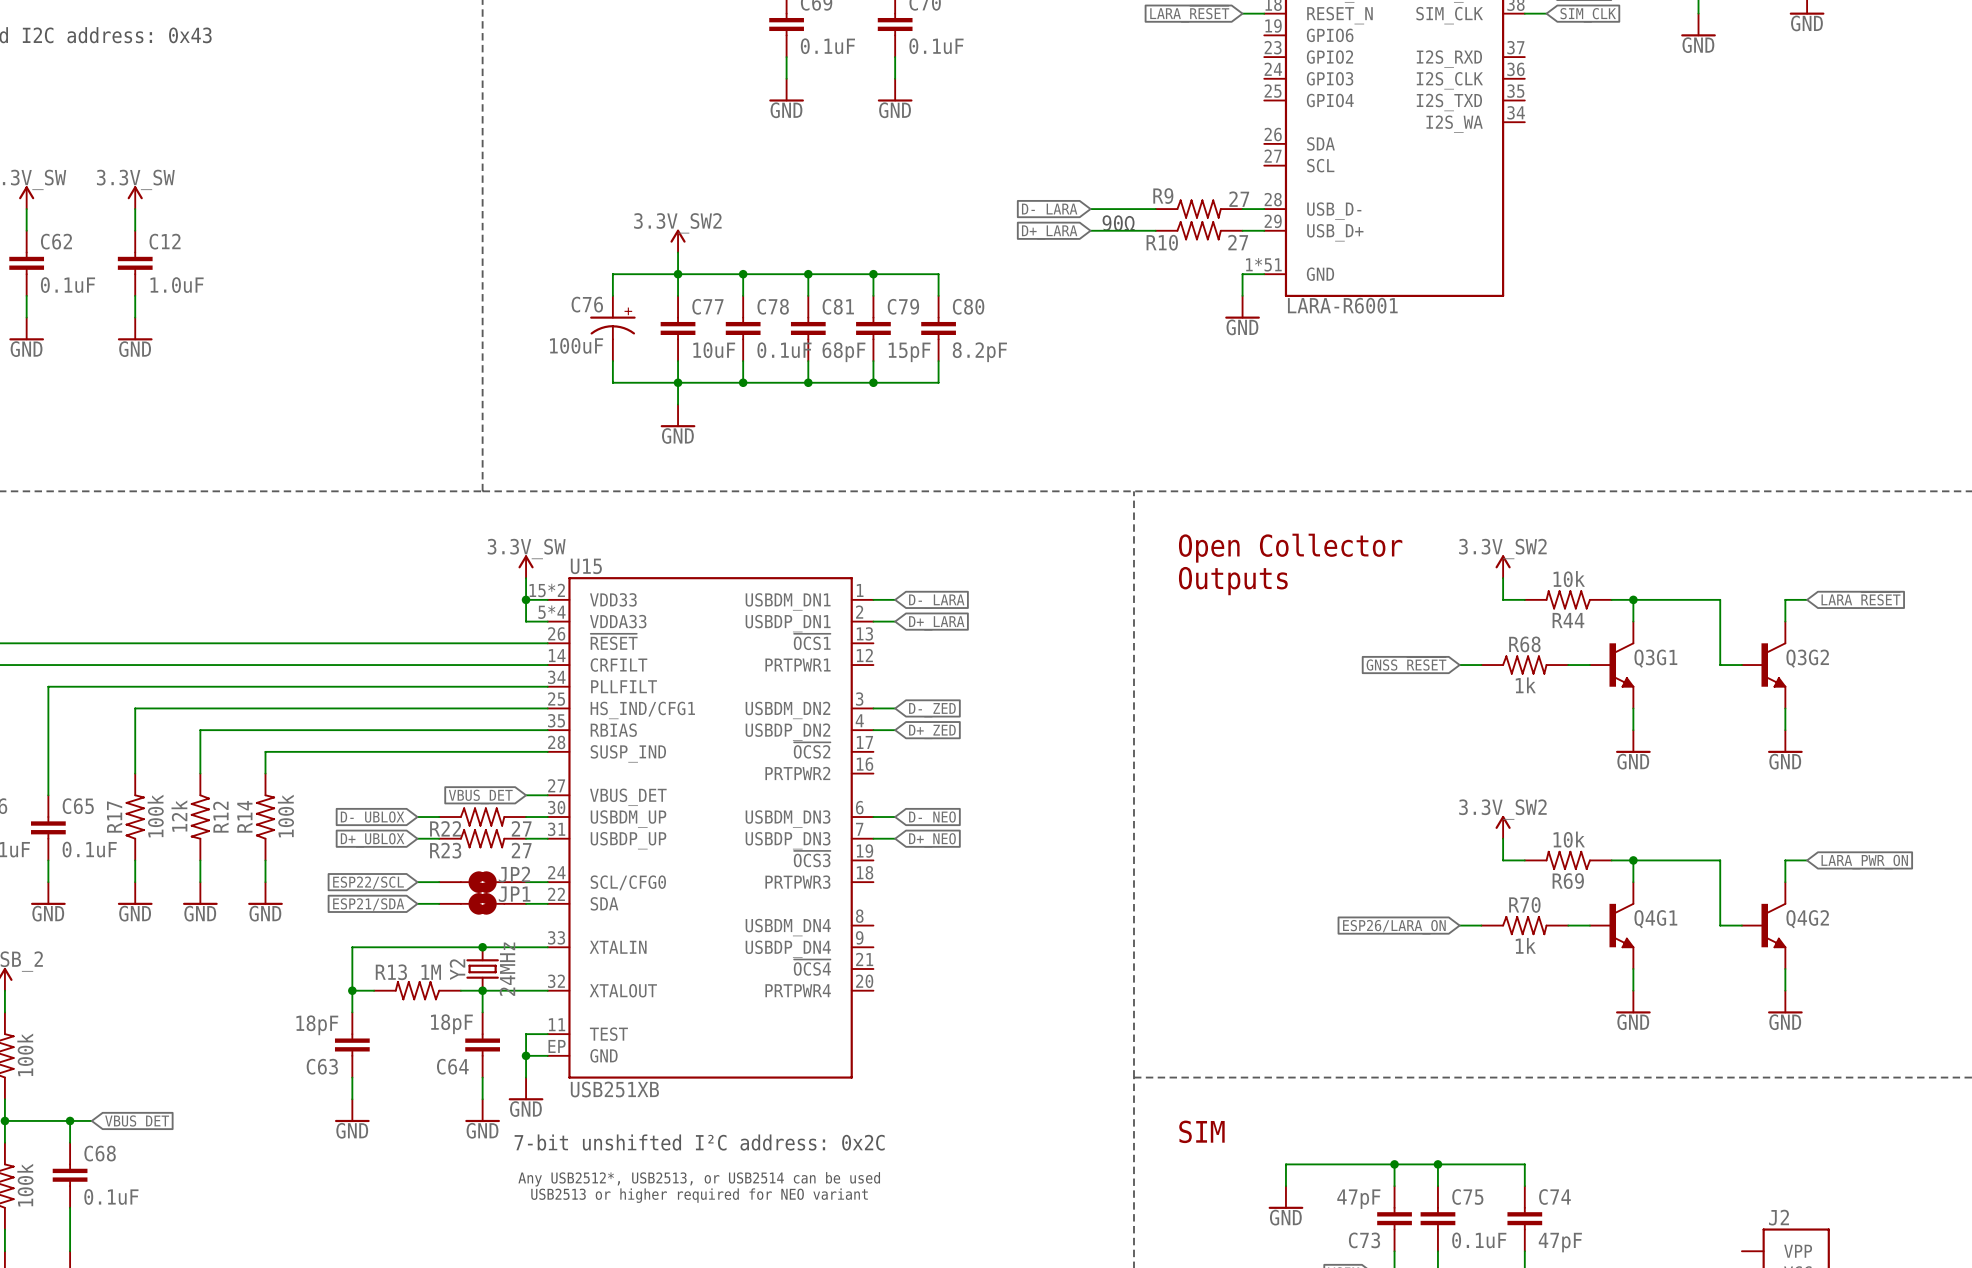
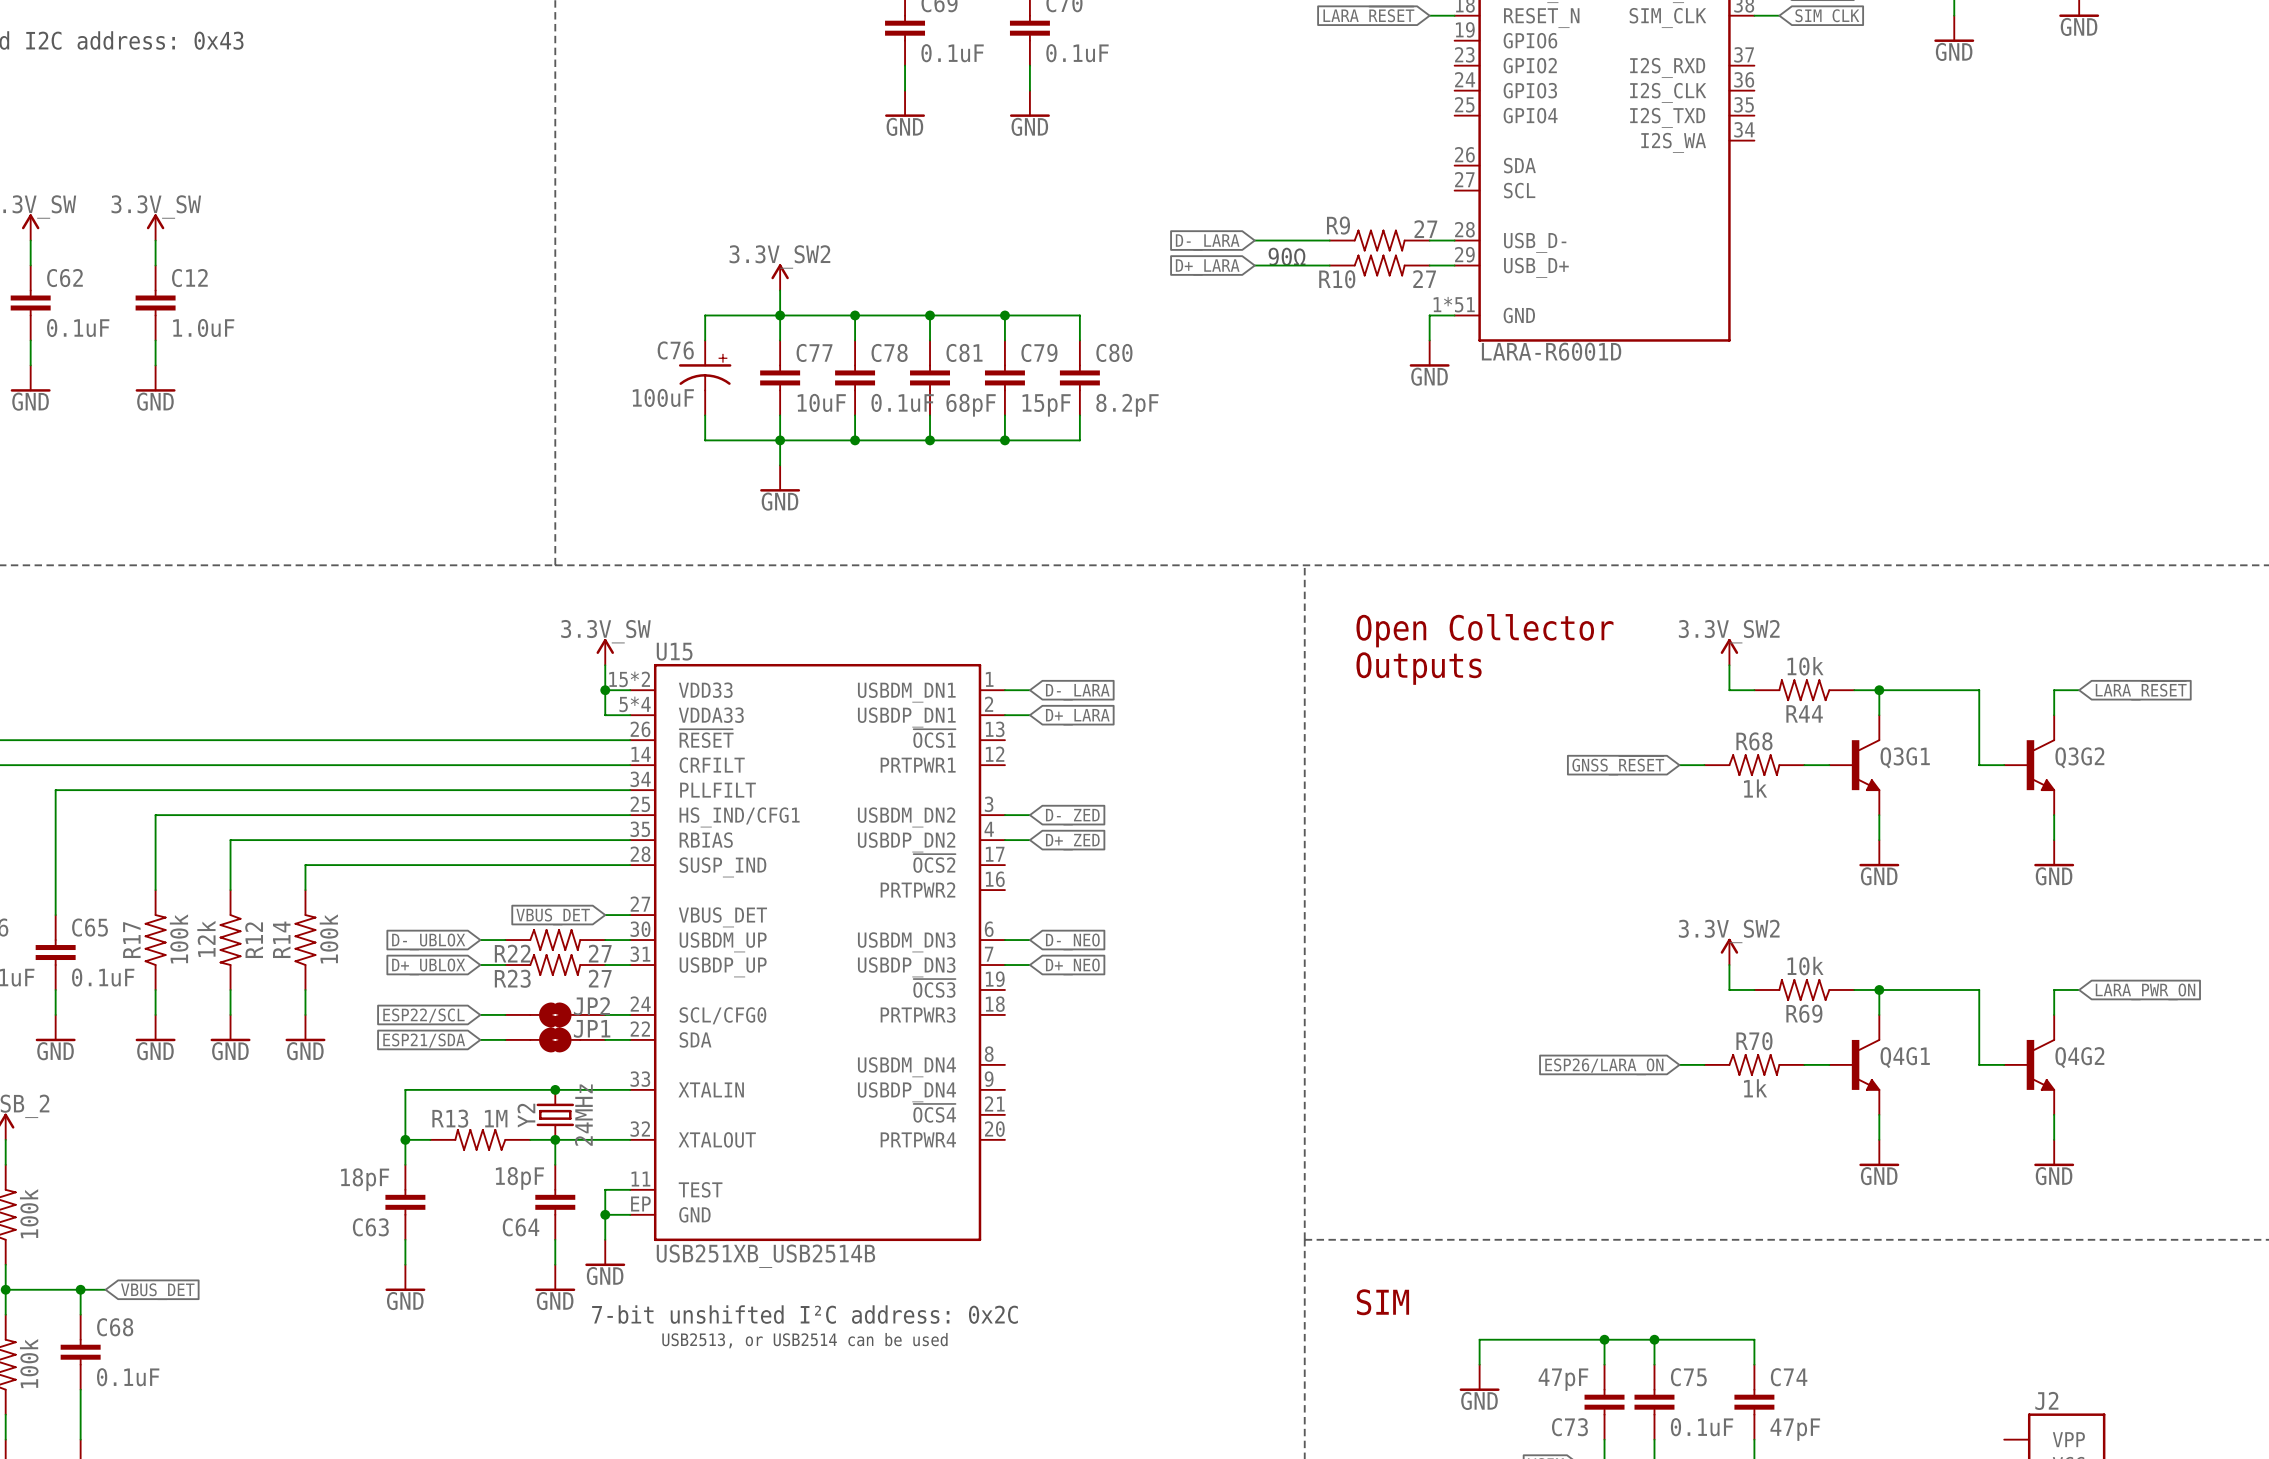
part value: LARA-R6001 (1342, 305) -> LARA-R6001D (1551, 351)
U15 value: USB251XB (614, 1089) -> USB251XB_USB2514B (765, 1256)
text: Any USB2512*, USB2513, or USB2514 can be used (699, 1179) -> USB2513, or USB2514 can be used (804, 1340)
text: USB2513 or higher required for NEO variant (699, 1195) -> none

